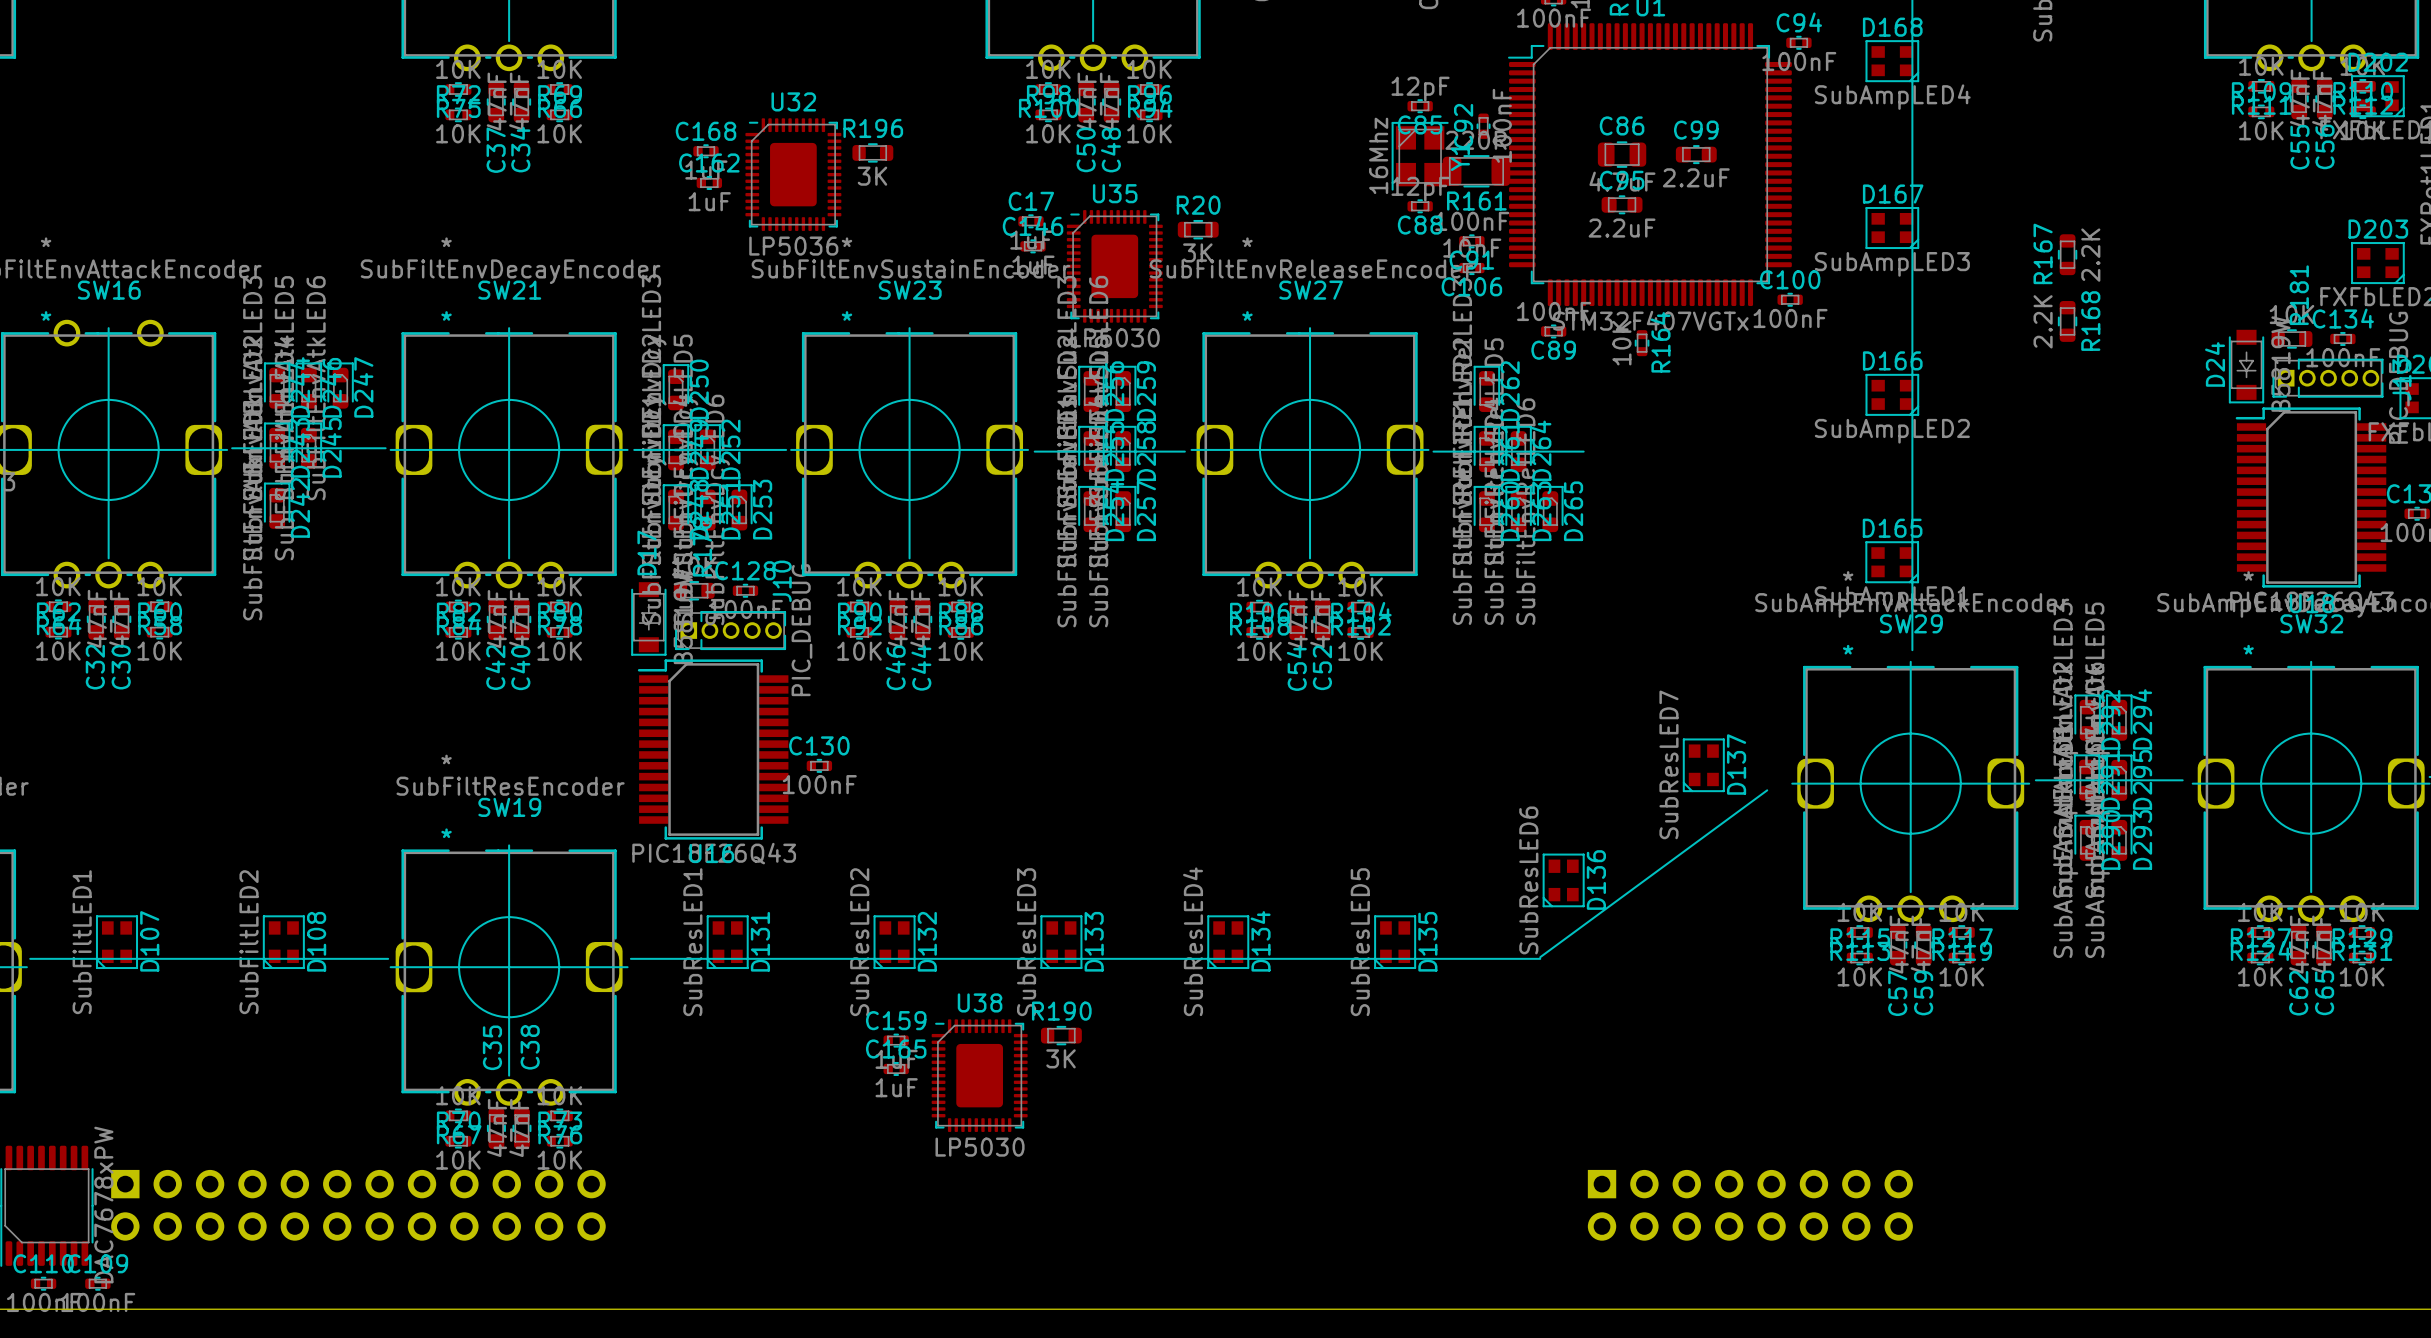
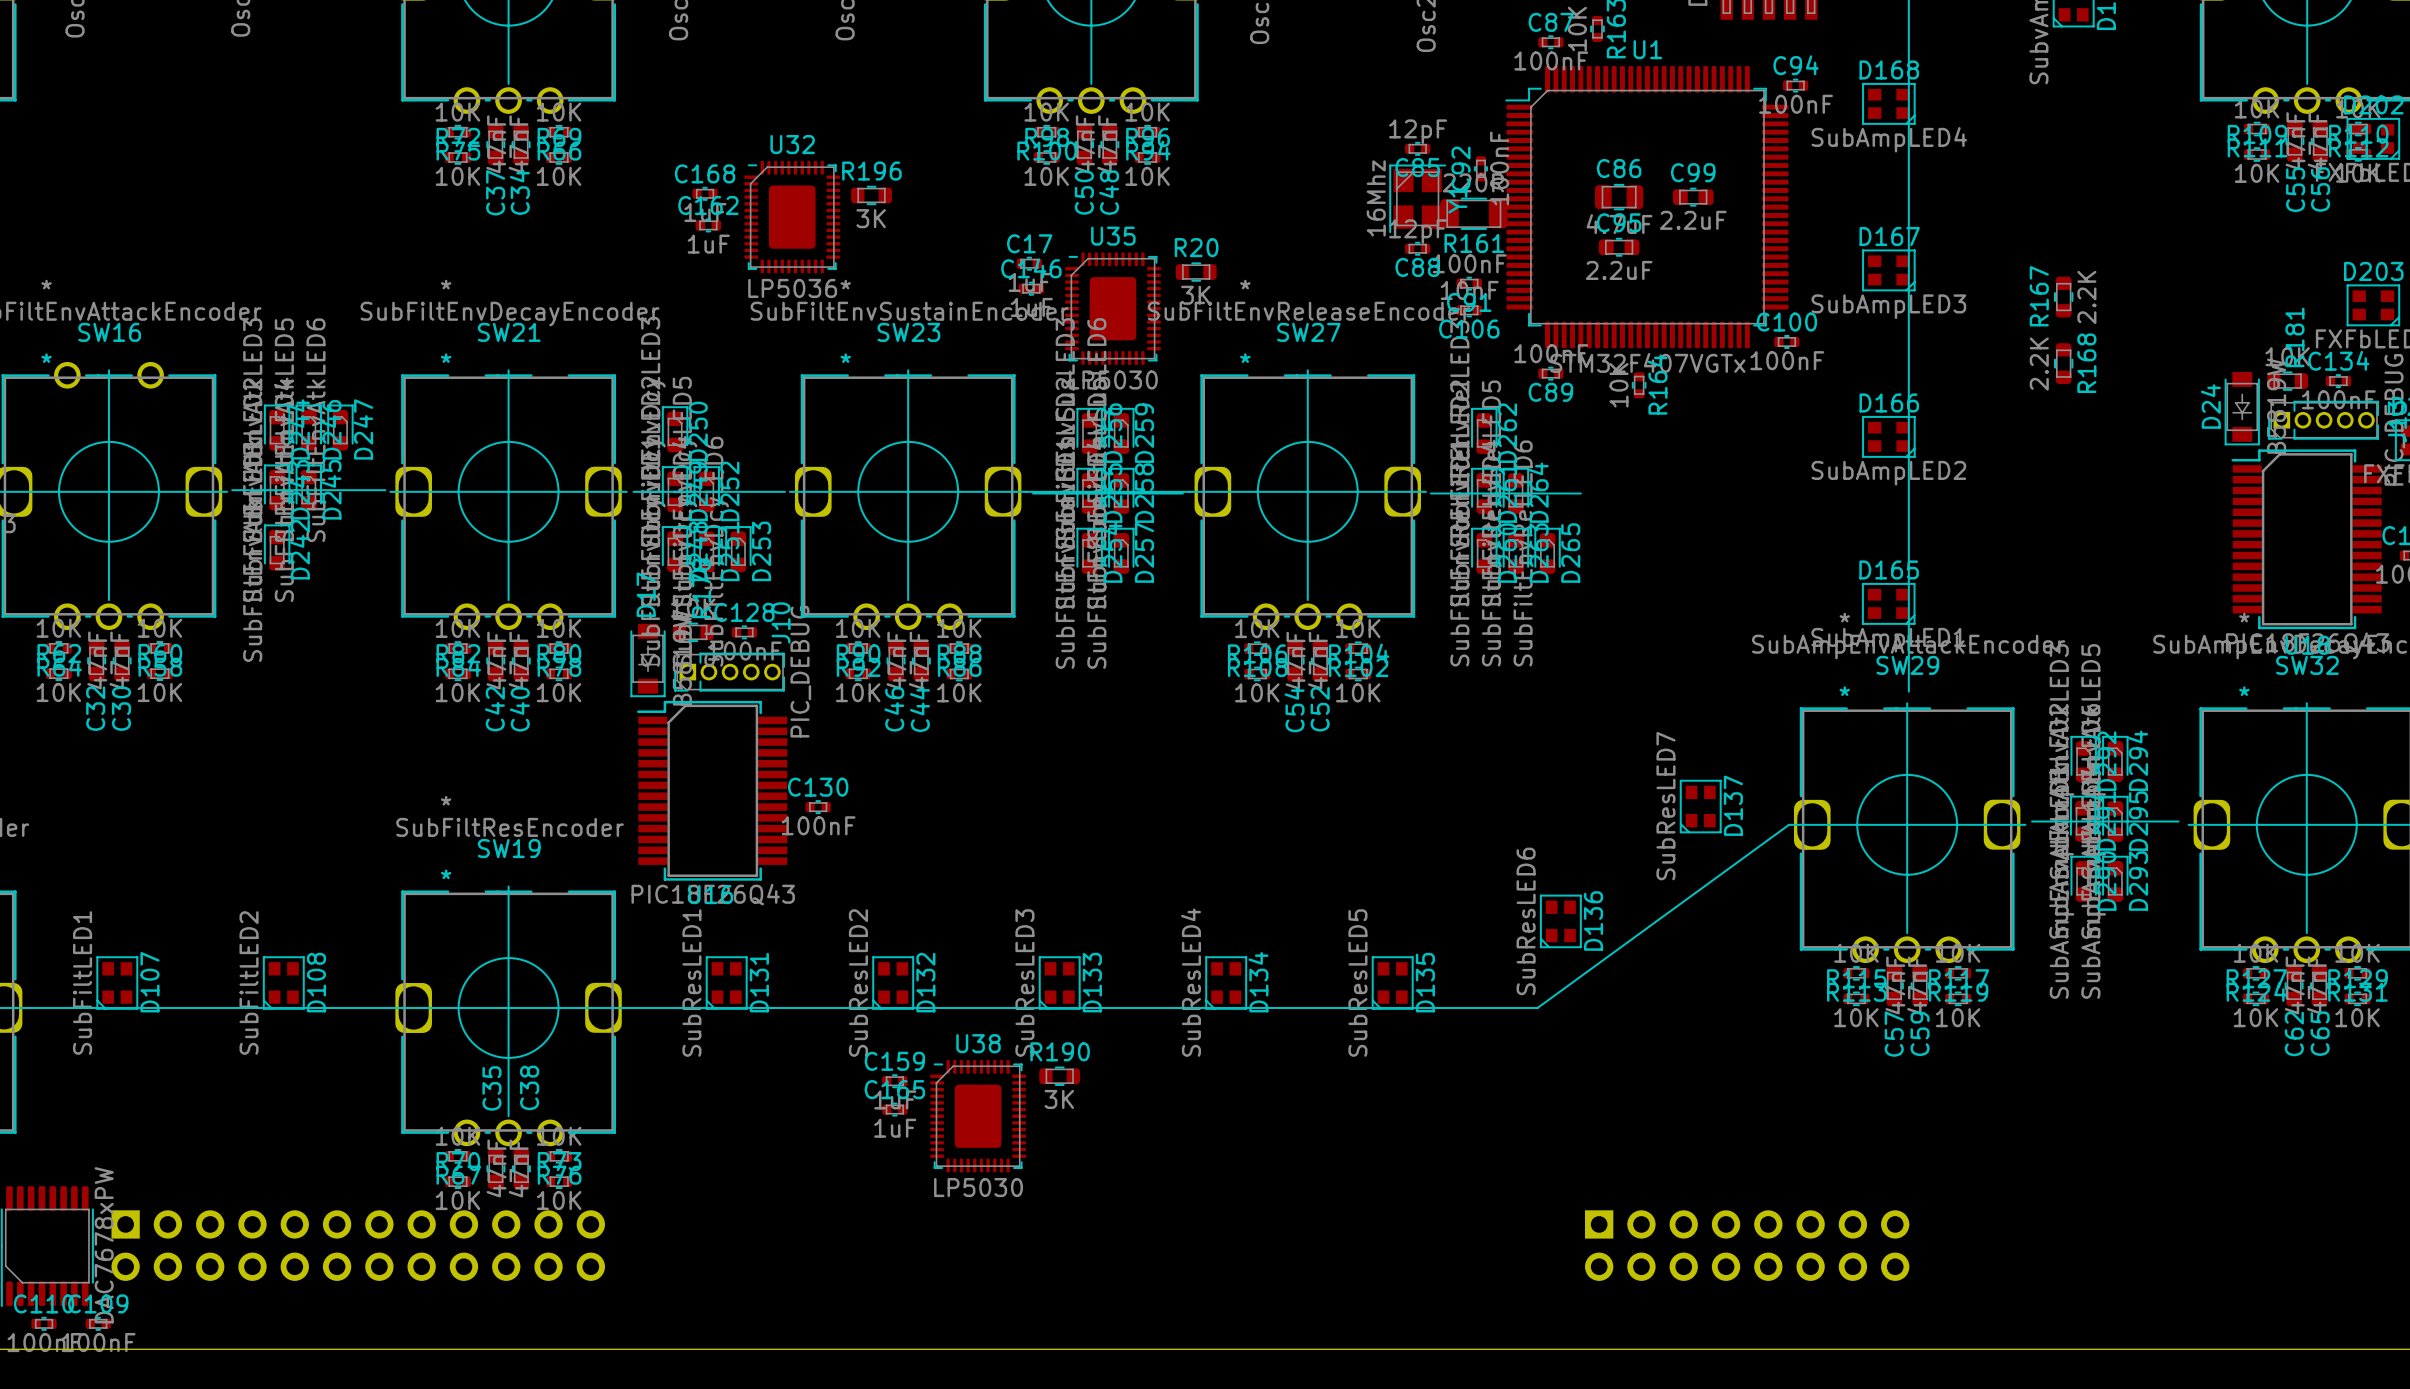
line: none -> (1026, 491) (1189, 491)
line: none -> (1788, 824) (1537, 1007) (626, 1007)
line: (1767, 790) (1540, 957) -> none
line: (30, 958) (388, 958) -> none
line: (630, 958) (1540, 958) -> none
line: none -> (27, 1007) (390, 1007)

